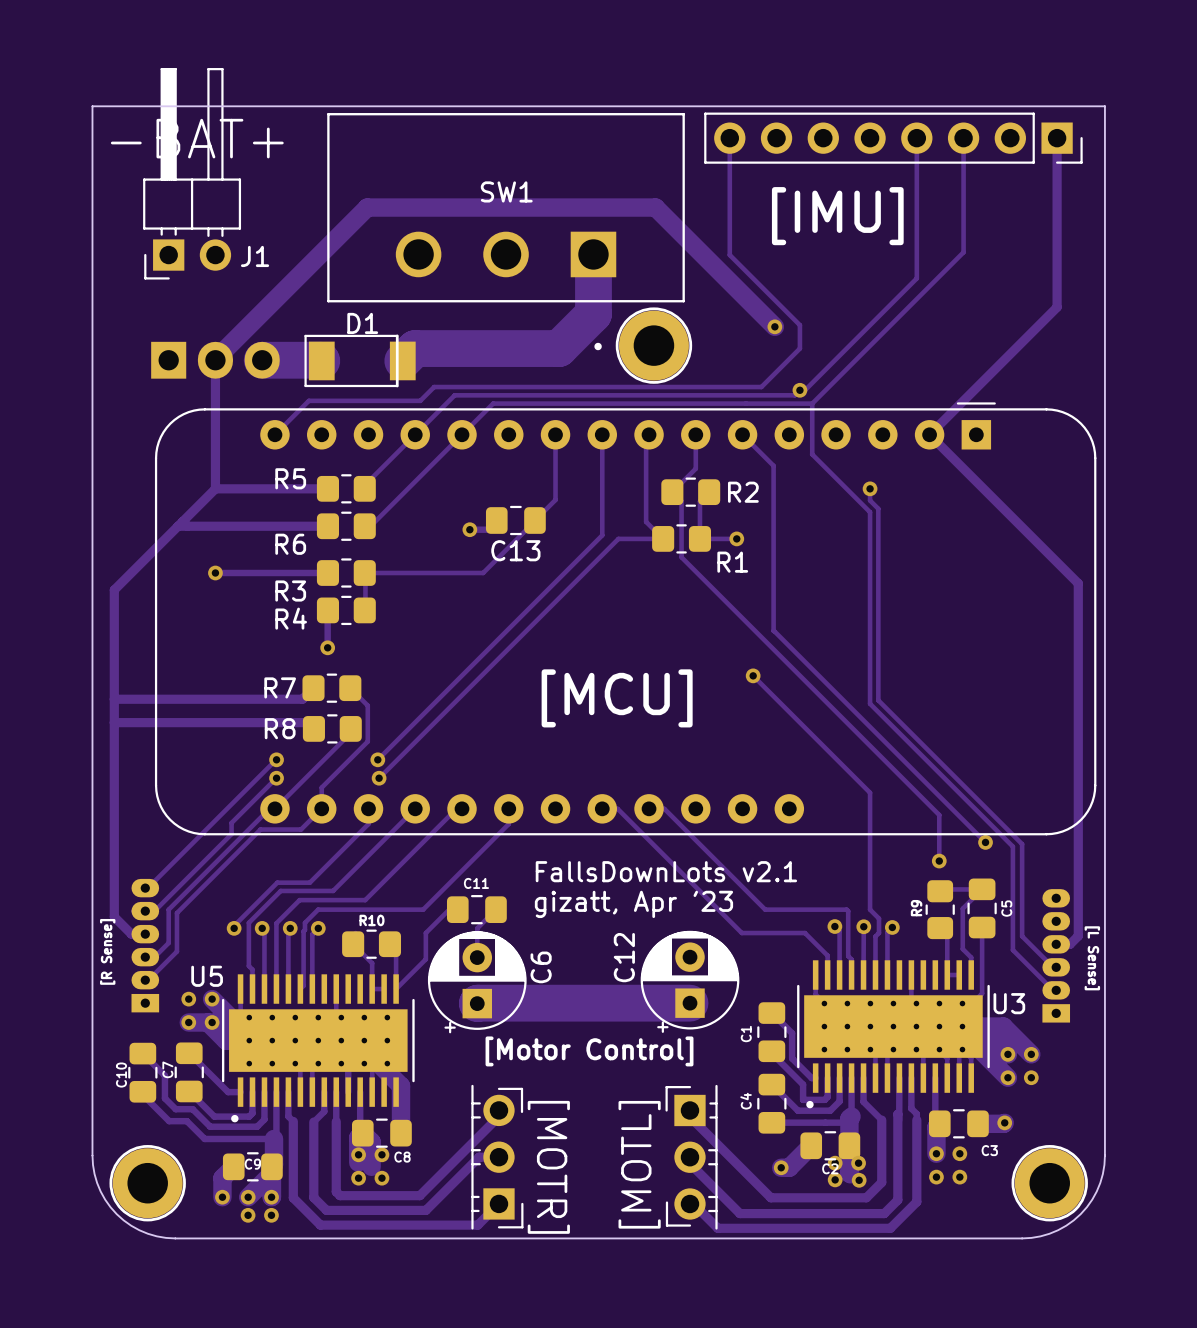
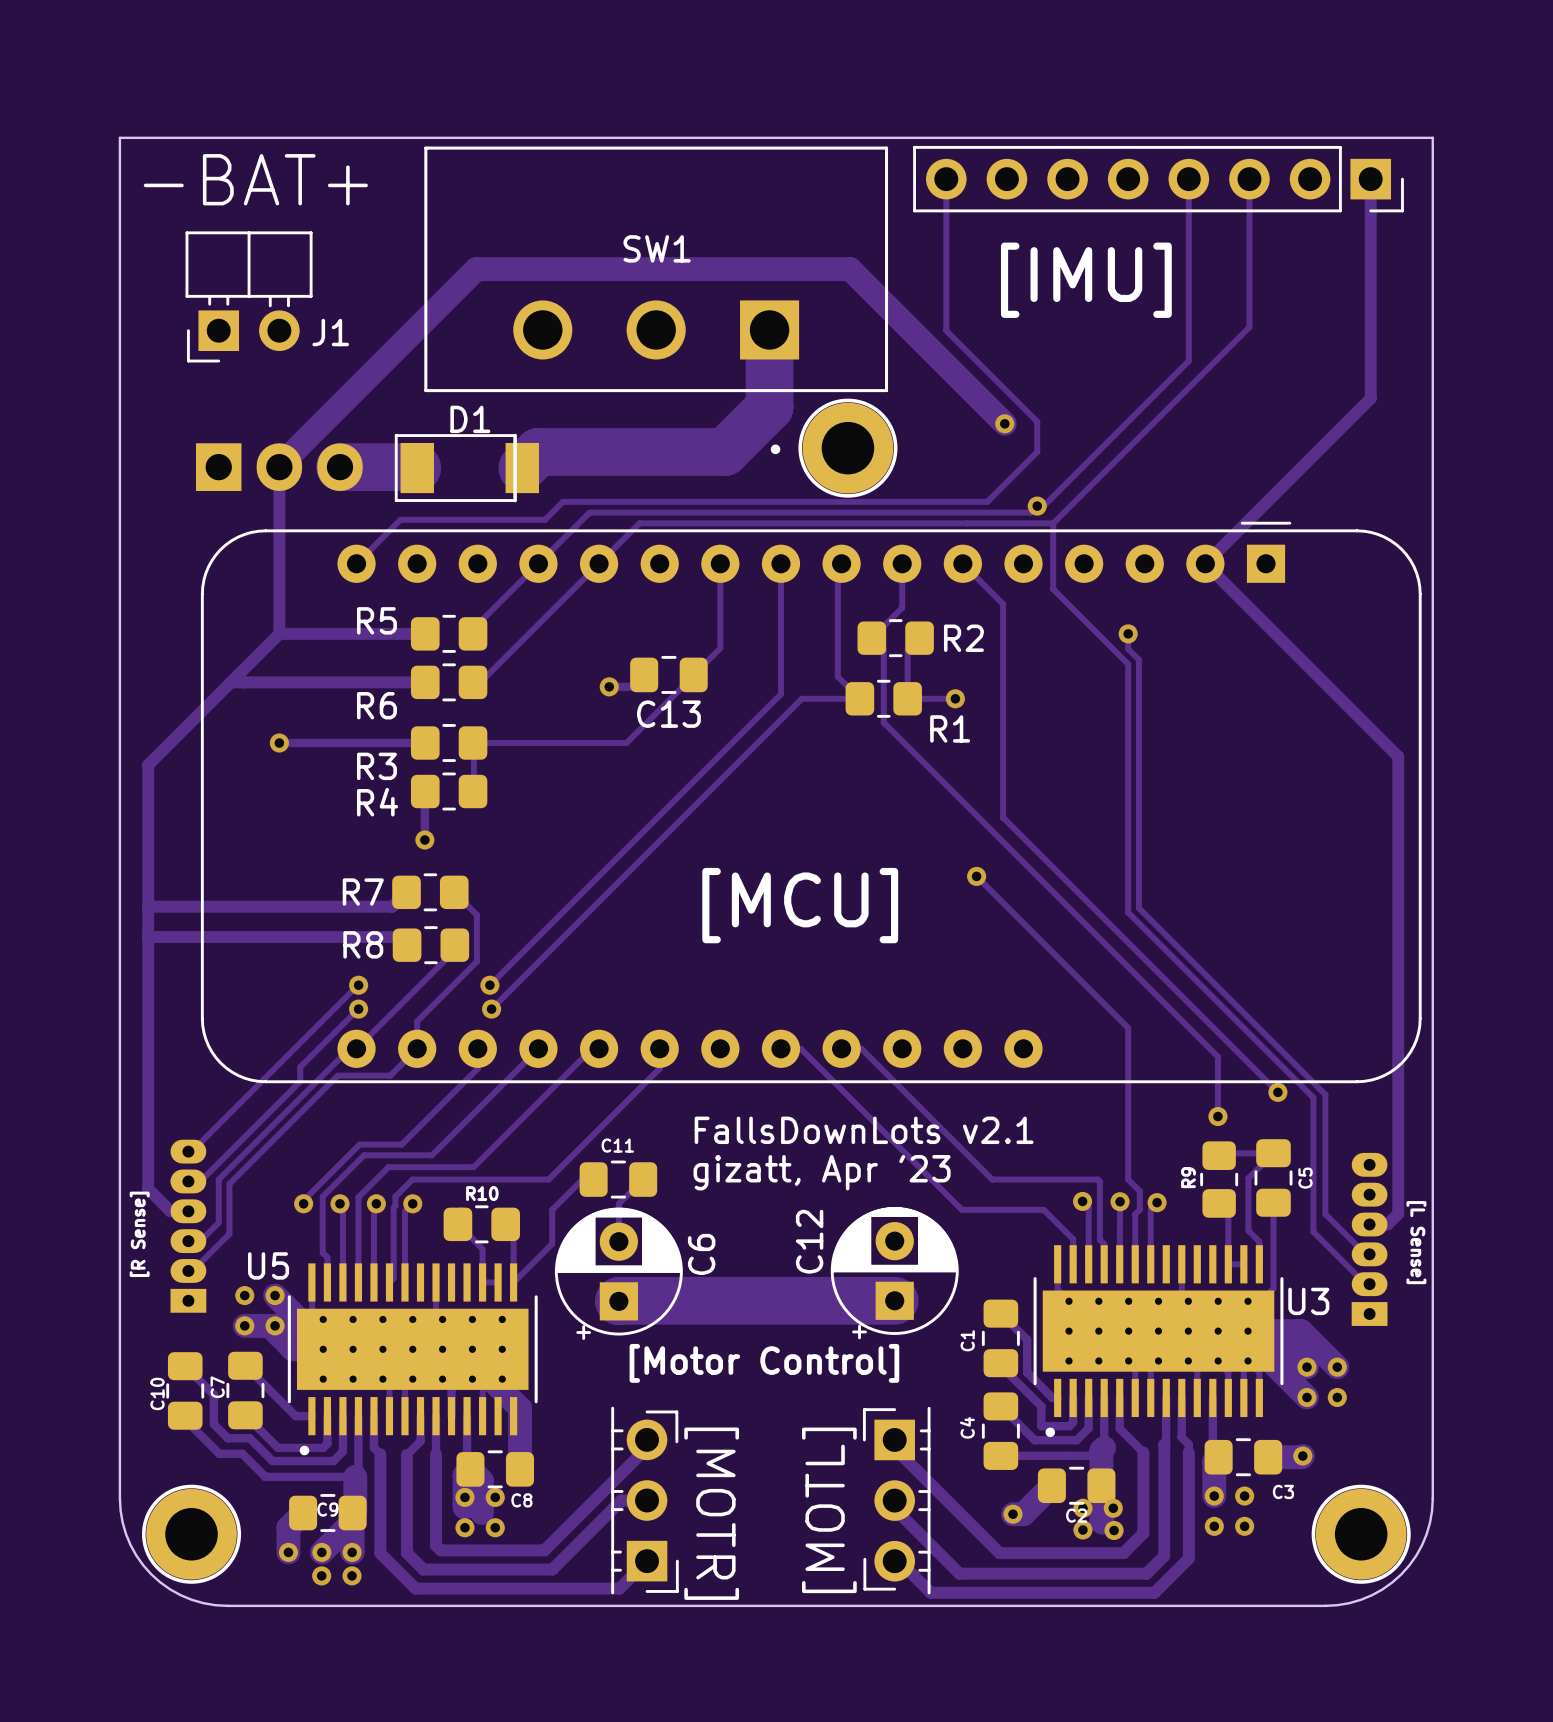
J1 footprint: [143, 68, 242, 280] -> [185, 231, 313, 363]

